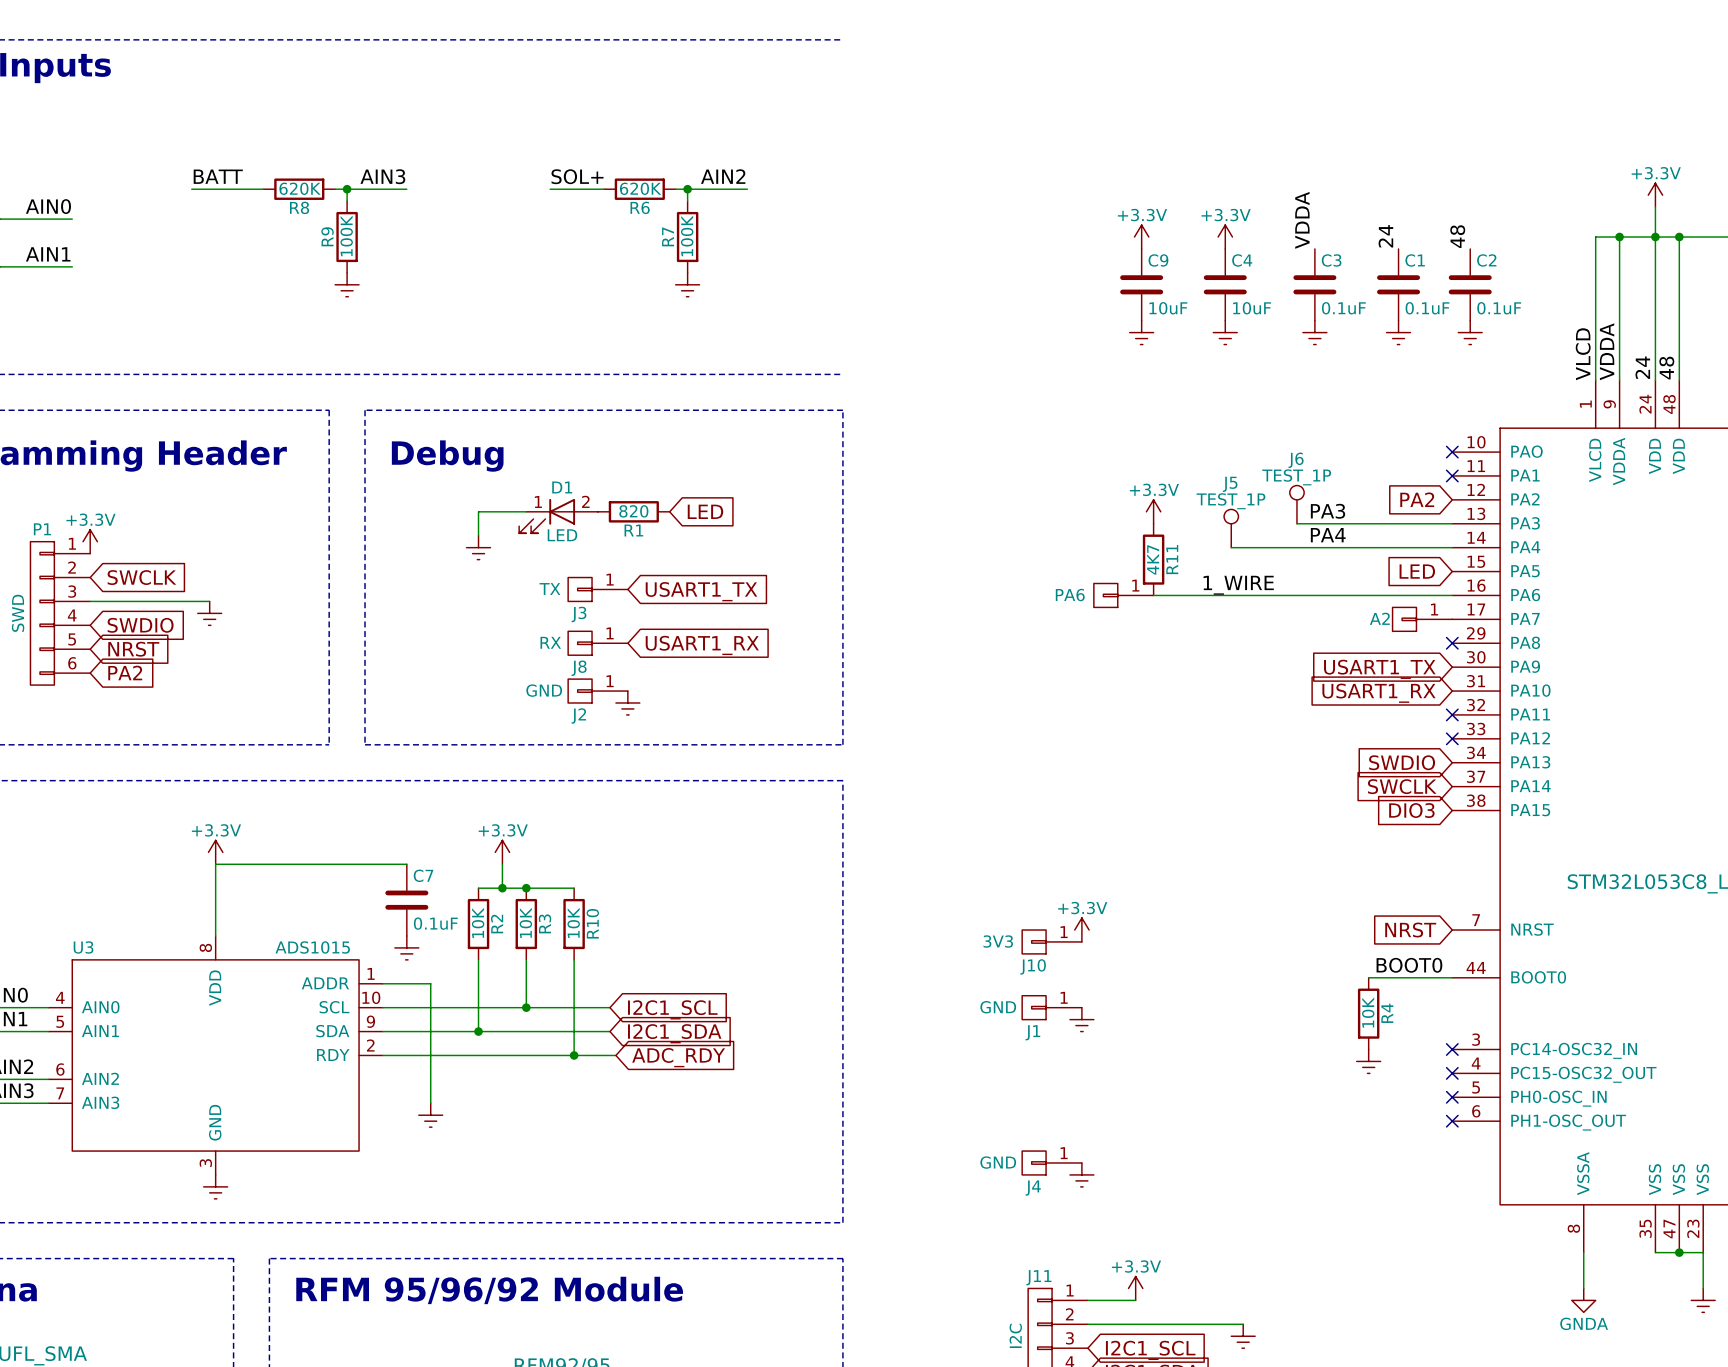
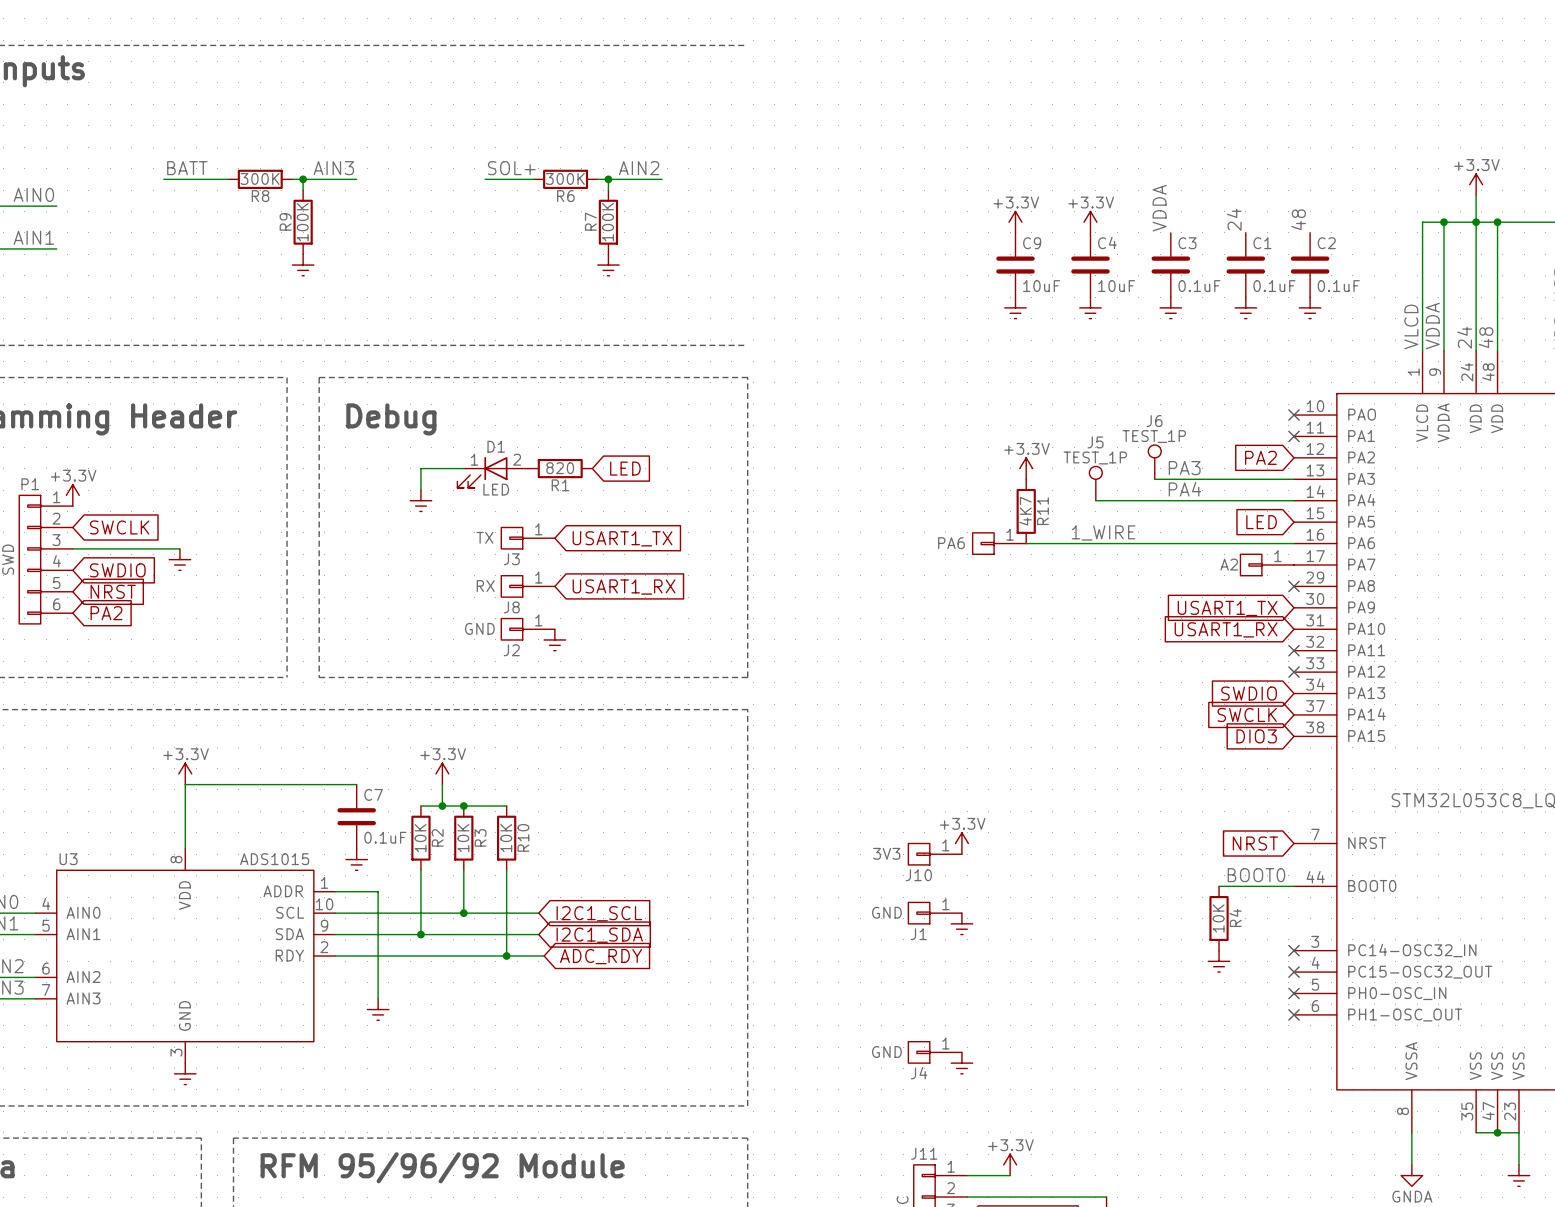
R8 value: 620K (300, 188) -> 300K (260, 178)
R6 value: 620K (640, 188) -> 300K (565, 178)

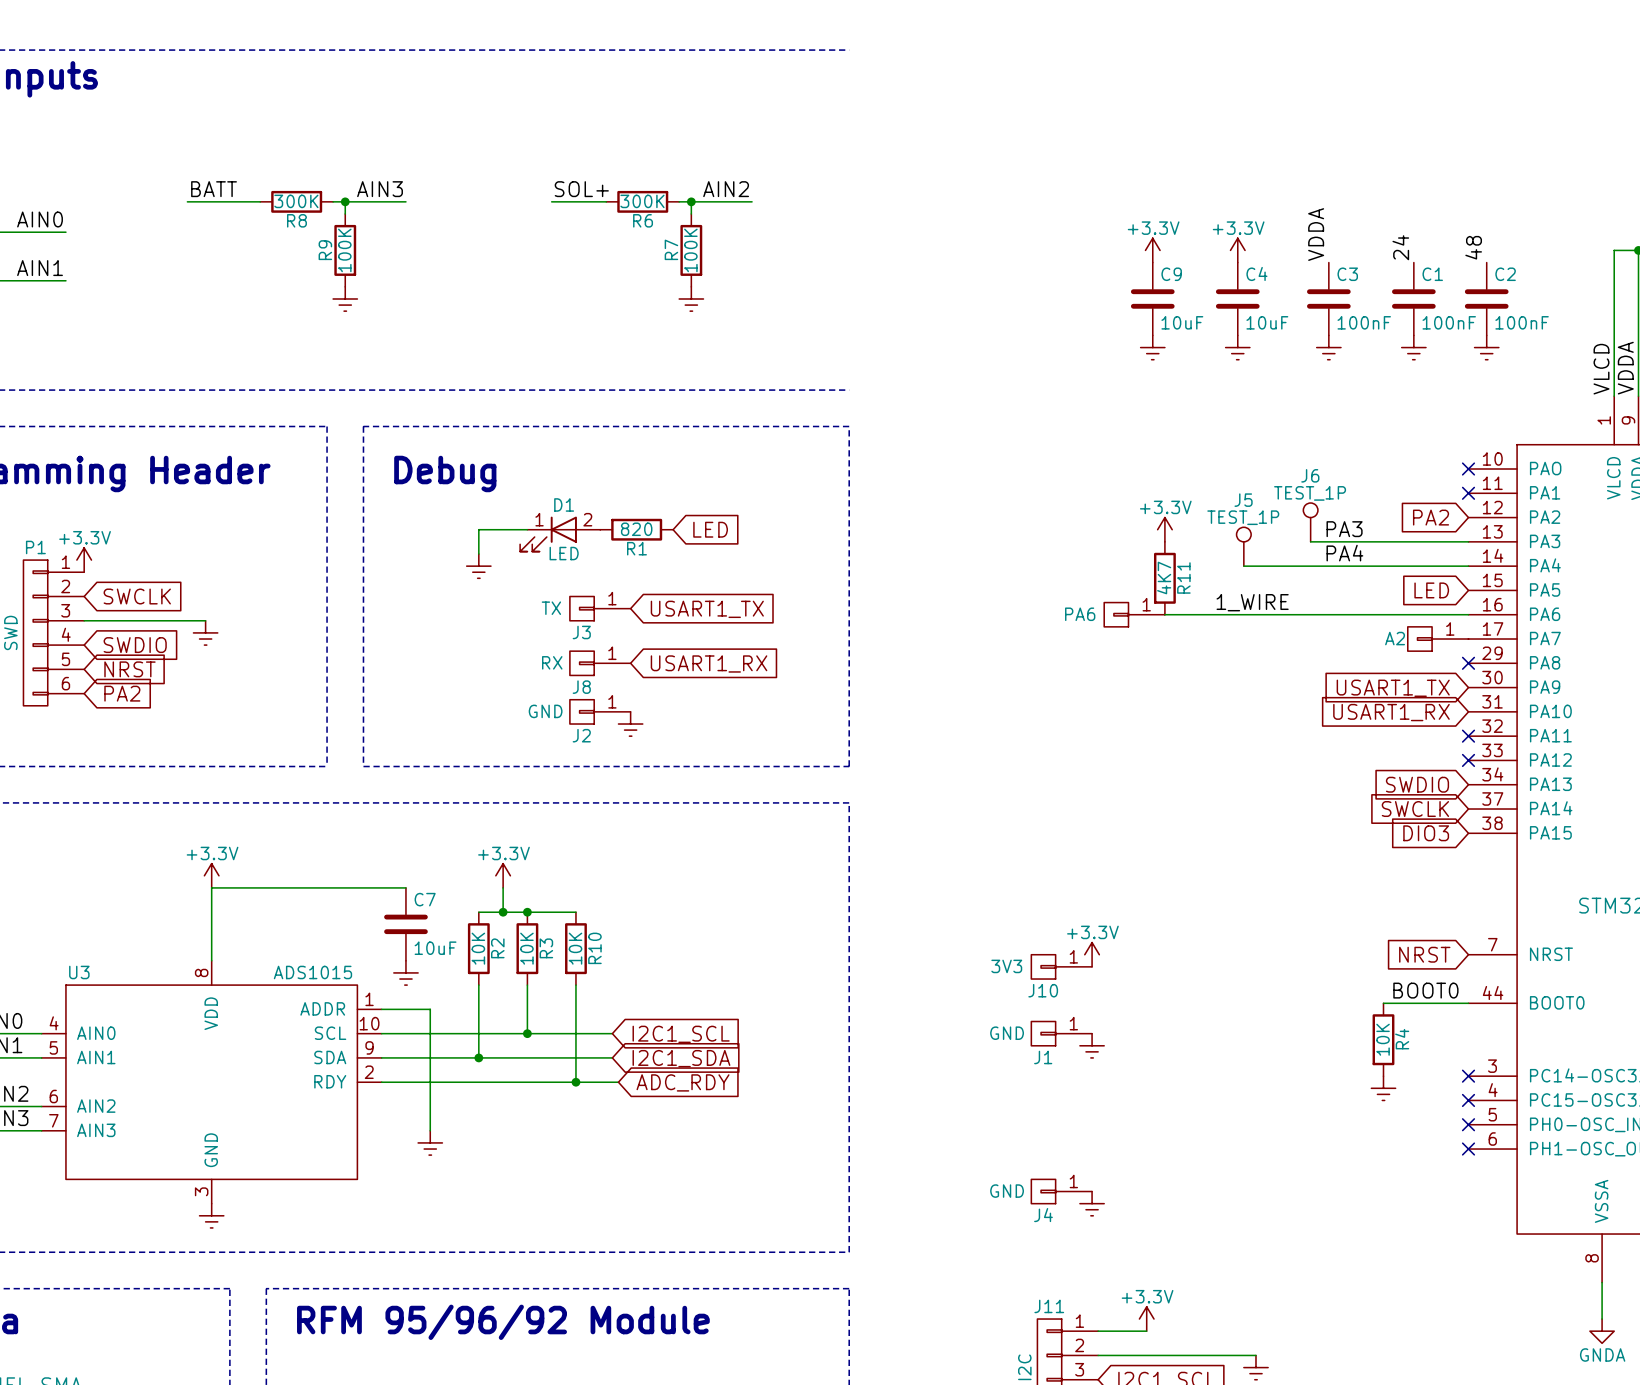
C3 value: 0.1uF (1199, 286) -> 100nF (1364, 322)
C1 value: 0.1uF (1274, 286) -> 100nF (1449, 322)
C2 value: 0.1uF (1338, 286) -> 100nF (1522, 322)
C7 value: 0.1uF (385, 837) -> 10uF (435, 948)

